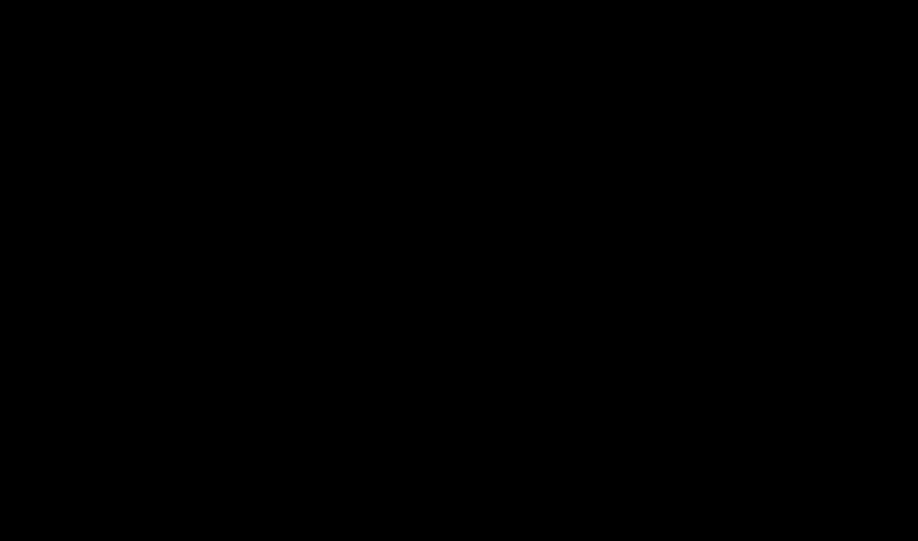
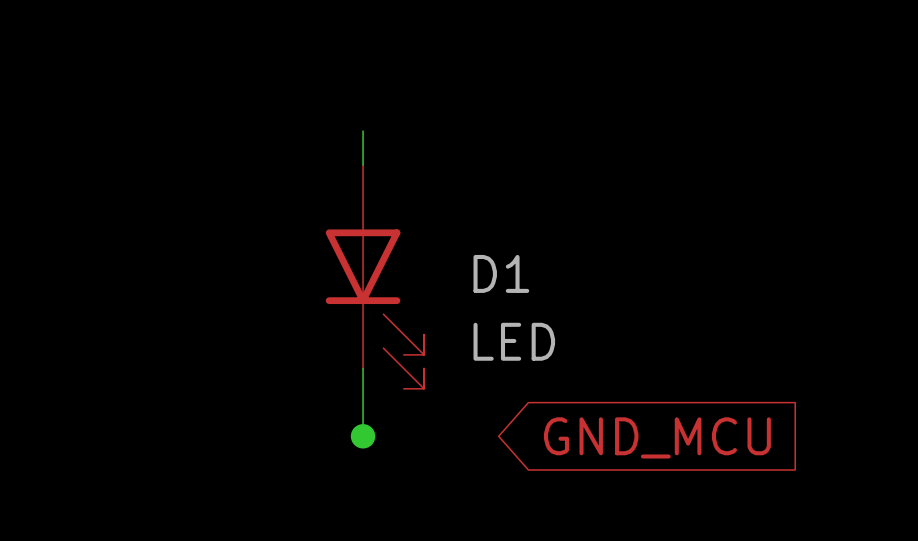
wire: none -> (363, 131) (363, 164)
D1: none -> LED (374, 276)
wire: none -> (363, 368) (363, 436)
junction: none -> (363, 436)
global label: none -> GND_MCU (657, 437)

